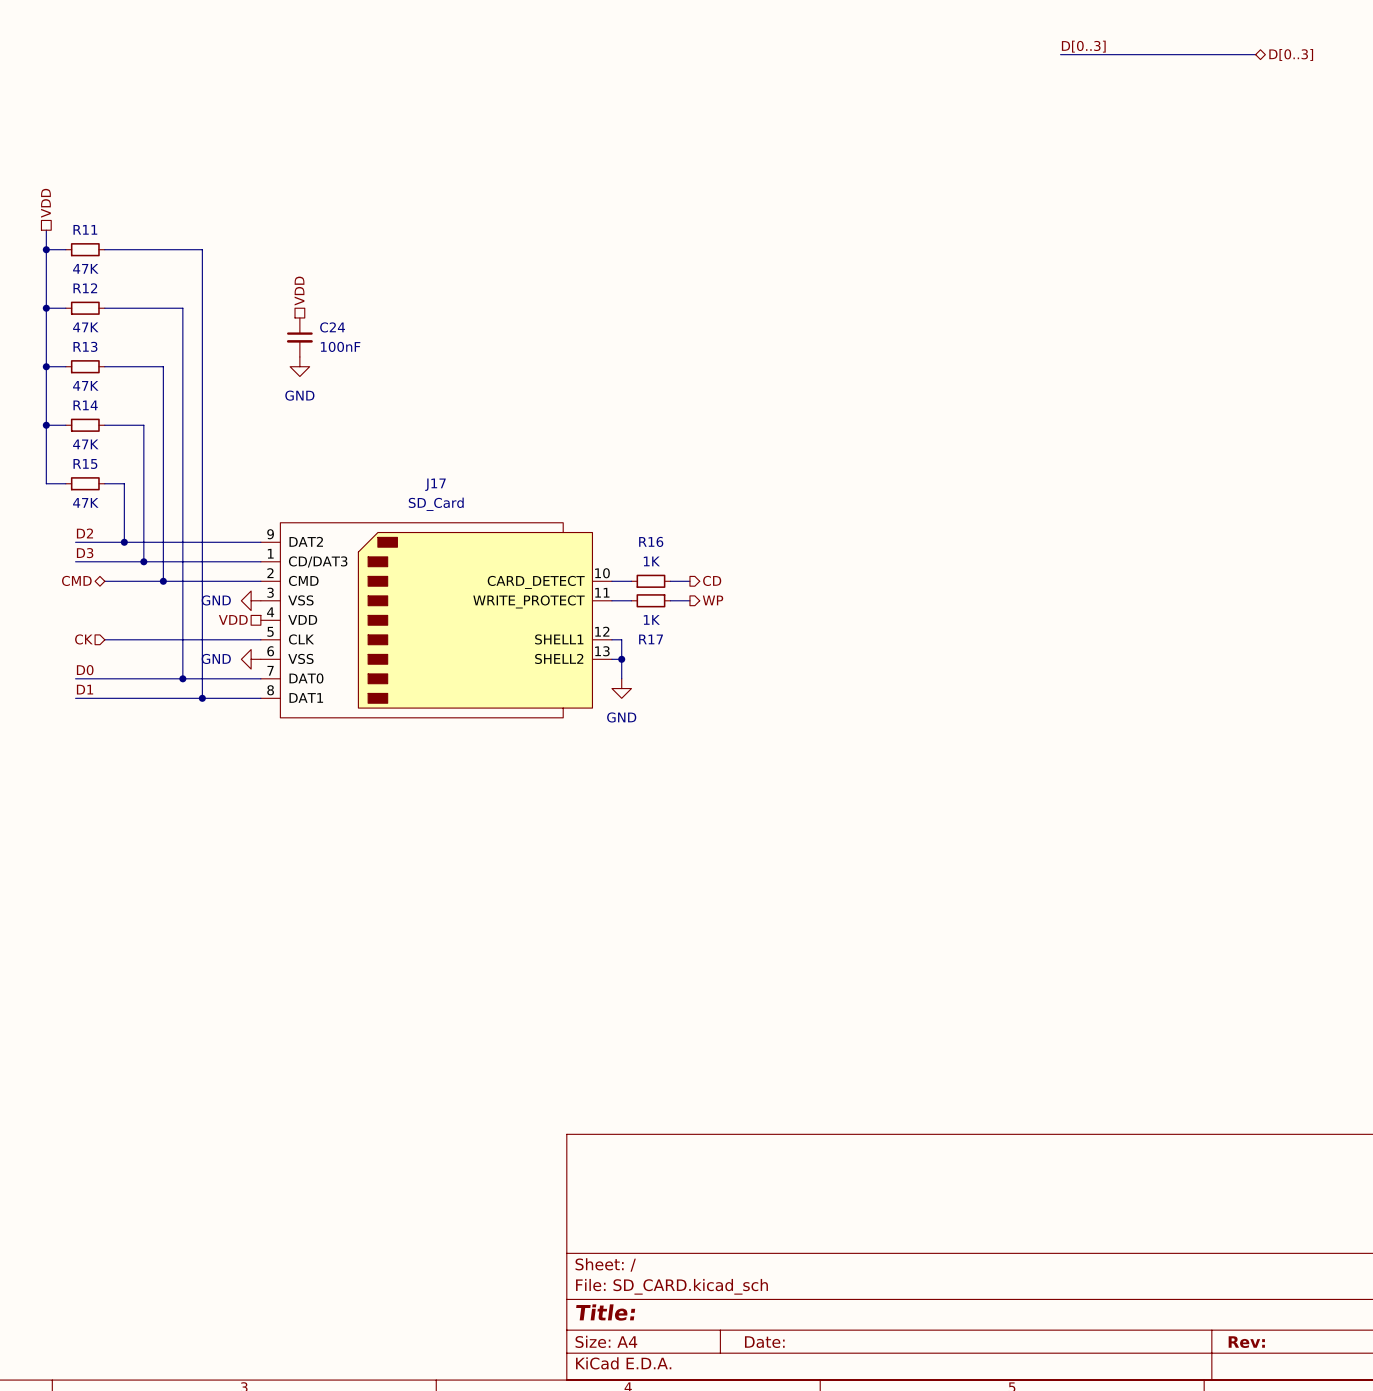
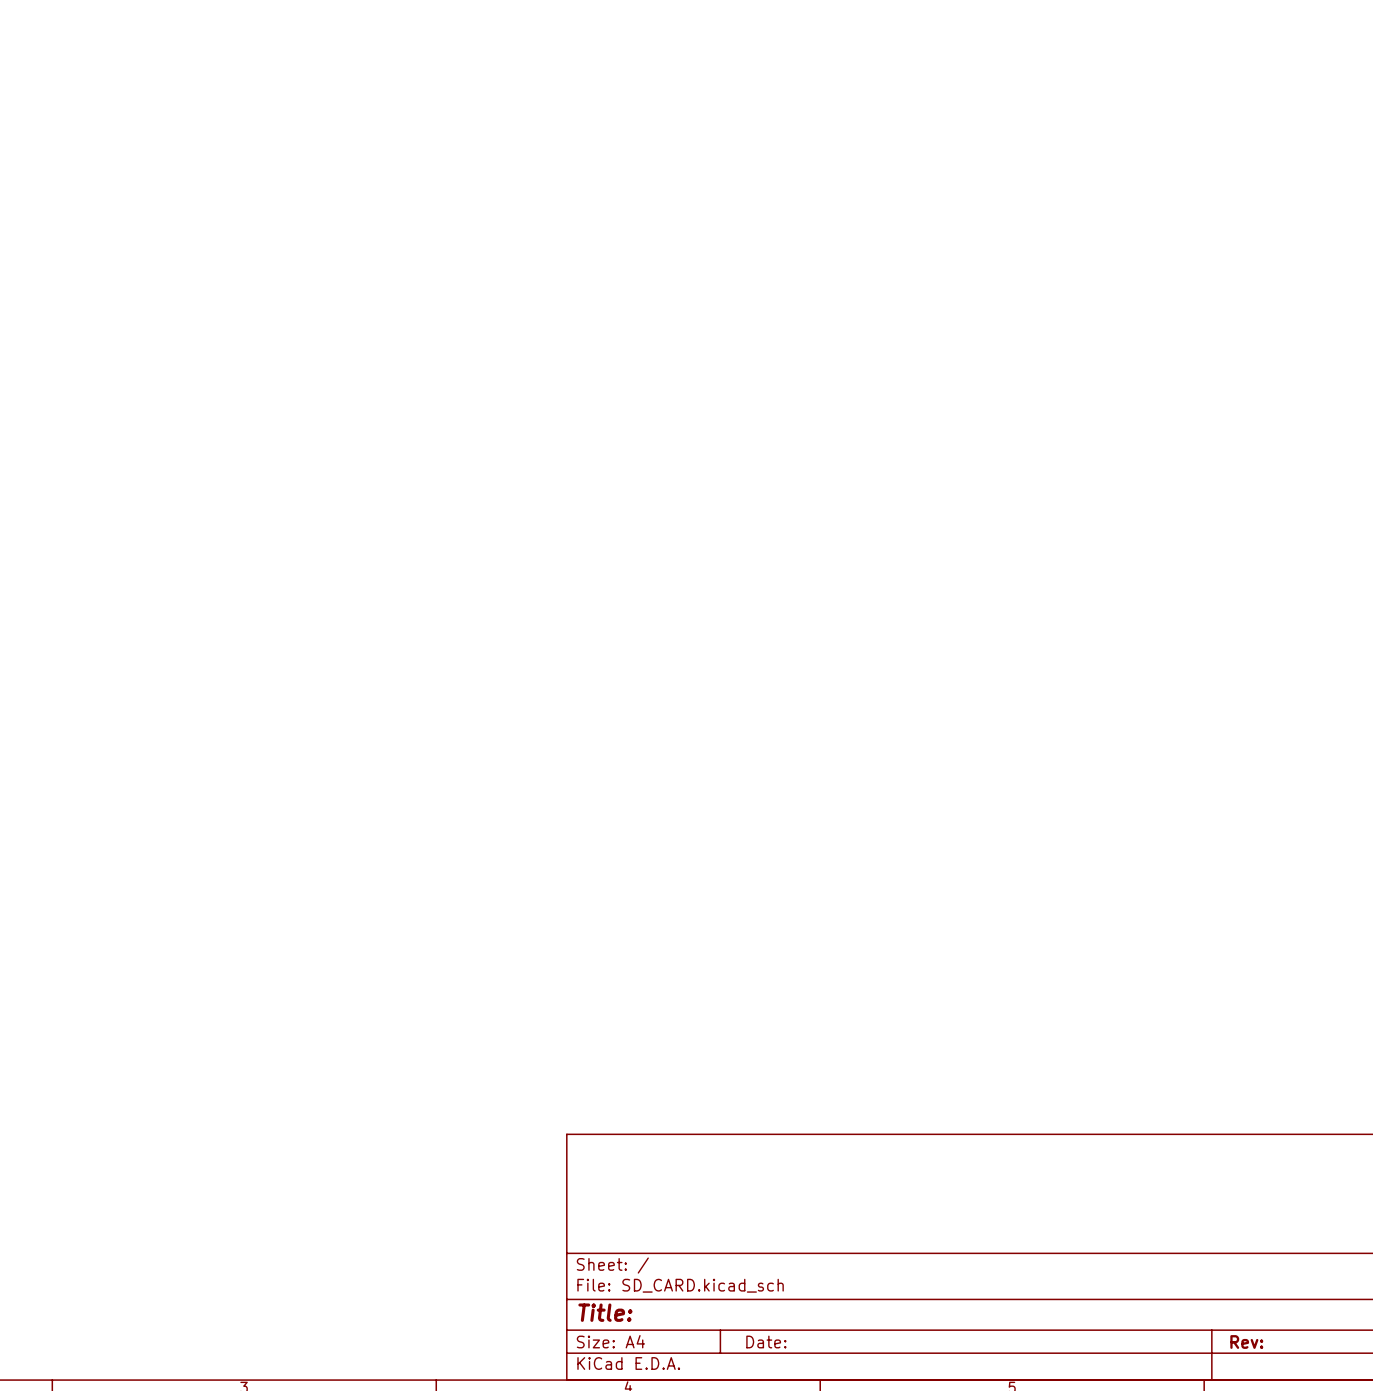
label: D[0..3] (1083, 46) -> none
bus: (1060, 54) (1255, 54) -> none
hierarchical label: D[0..3] (1291, 54) -> none
hierarchical label: VDD (45, 203) -> none
wire: (46, 230) (46, 483) (65, 483) -> none
wire: (46, 249) (65, 249) -> none
junction: (46, 249) -> none
R11: 47K (85, 249) -> none
wire: (104, 249) (202, 249) (202, 698) -> none
hierarchical label: VDD (299, 291) -> none
wire: (46, 308) (65, 308) -> none
junction: (46, 308) -> none
R12: 47K (85, 308) -> none
wire: (104, 308) (182, 308) (182, 678) -> none
C24: 100nF (299, 337) -> none
wire: (46, 366) (65, 366) -> none
junction: (46, 366) -> none
R13: 47K (85, 366) -> none
wire: (104, 366) (163, 366) (163, 581) -> none
power symbol: GND (299, 366) -> none
wire: (46, 425) (65, 425) -> none
junction: (46, 425) -> none
R14: 47K (85, 425) -> none
wire: (104, 425) (143, 425) (143, 561) -> none
R15: 47K (85, 483) -> none
wire: (104, 483) (124, 483) (124, 542) -> none
label: D2 (84, 533) -> none
wire: (75, 542) (260, 542) -> none
junction: (124, 542) -> none
label: D3 (85, 553) -> none
wire: (75, 561) (260, 561) -> none
junction: (143, 561) -> none
hierarchical label: CMD (76, 580) -> none
hierarchical label: CD (712, 580) -> none
wire: (104, 581) (260, 581) -> none
junction: (163, 581) -> none
wire: (611, 581) (631, 581) -> none
R16: 1K (650, 581) -> none
wire: (670, 581) (689, 581) -> none
power symbol: GND (251, 600) -> none
wire: (611, 600) (631, 600) -> none
R17: 1K (650, 600) -> none
wire: (670, 600) (689, 600) -> none
hierarchical label: WP (713, 600) -> none
hierarchical label: VDD (233, 619) -> none
J17: SD_Card (436, 620) -> none
hierarchical label: CK (83, 639) -> none
wire: (104, 639) (260, 639) -> none
wire: (611, 639) (621, 639) (621, 678) -> none
power symbol: GND (251, 659) -> none
wire: (611, 659) (621, 659) -> none
junction: (621, 659) -> none
label: D0 (85, 670) -> none
wire: (75, 678) (260, 678) -> none
junction: (182, 678) -> none
power symbol: GND (621, 688) -> none
label: D1 (85, 689) -> none
wire: (75, 698) (260, 698) -> none
junction: (202, 698) -> none

